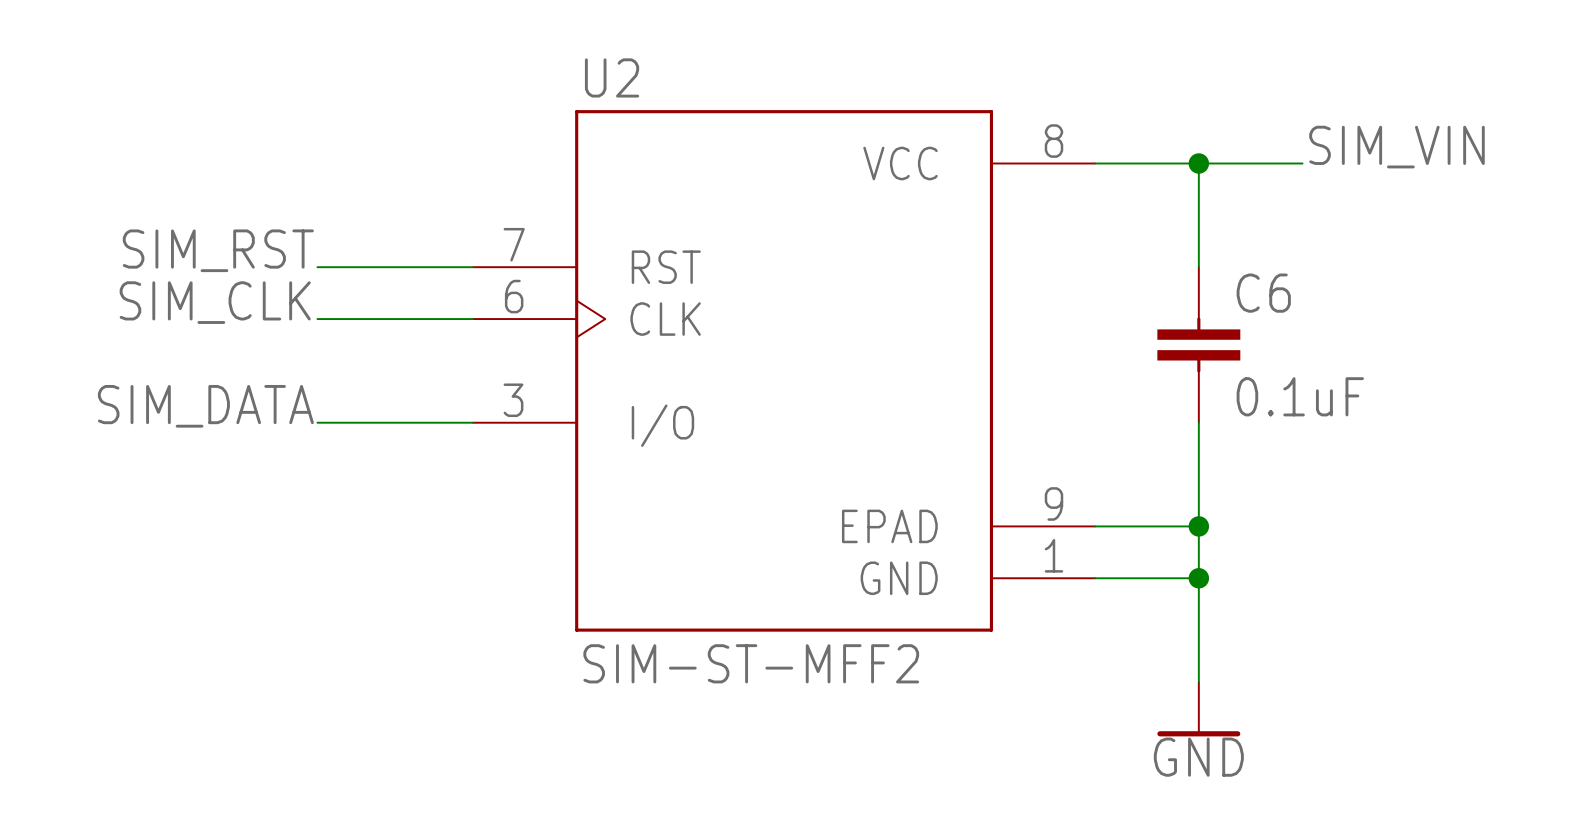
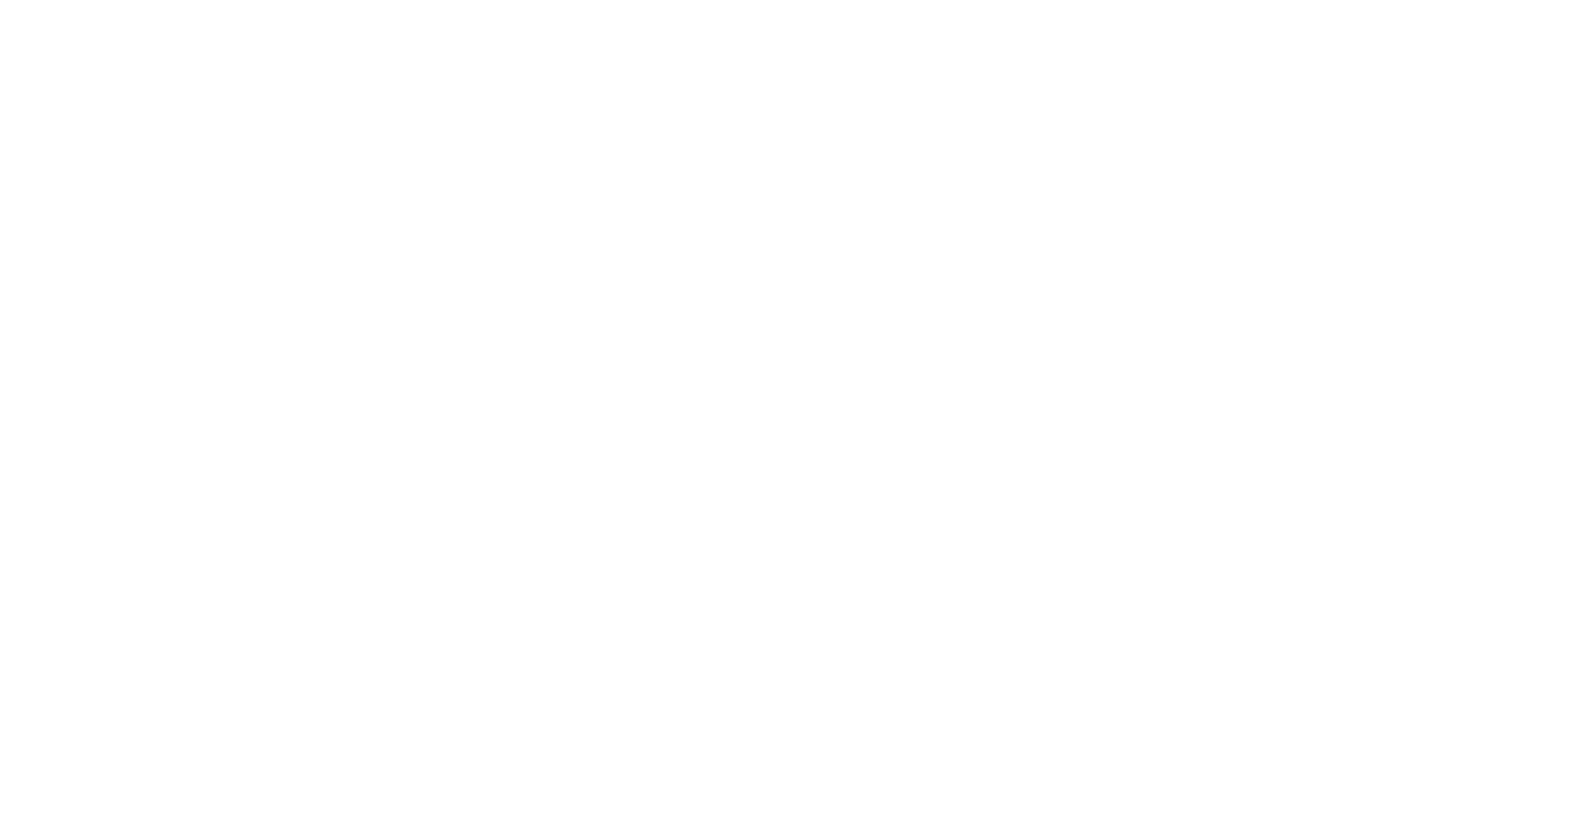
label: SIM_VIN (1396, 147) -> none
wire: (1095, 163) (1302, 163) -> none
wire: (1198, 163) (1198, 267) -> none
junction: (1198, 163) -> none
label: SIM_RST (218, 250) -> none
wire: (317, 267) (473, 267) -> none
label: SIM_CLK (215, 302) -> none
wire: (317, 319) (473, 319) -> none
C6: 0.1uF (1198, 344) -> none
U2: SIM-ST-MFF2 (784, 370) -> none
label: SIM_DATA (205, 406) -> none
wire: (317, 422) (473, 422) -> none
wire: (1198, 422) (1198, 681) -> none
wire: (1095, 526) (1198, 526) -> none
junction: (1198, 526) -> none
wire: (1095, 578) (1198, 578) -> none
junction: (1198, 578) -> none
power symbol: GND (1198, 709) -> none

